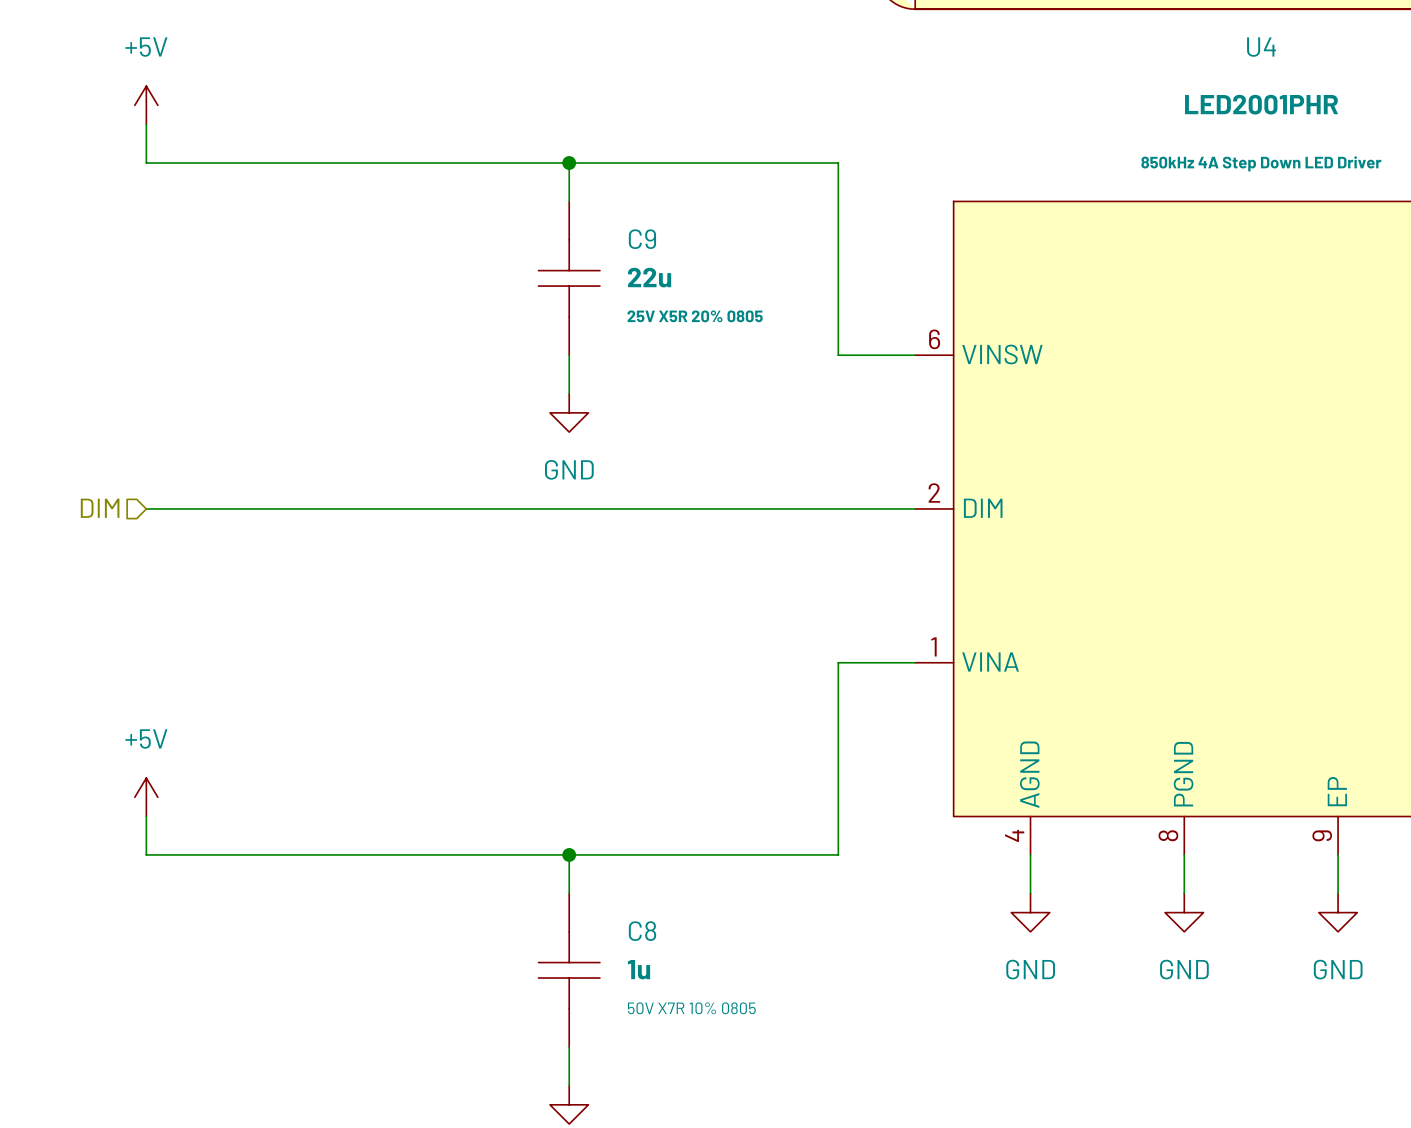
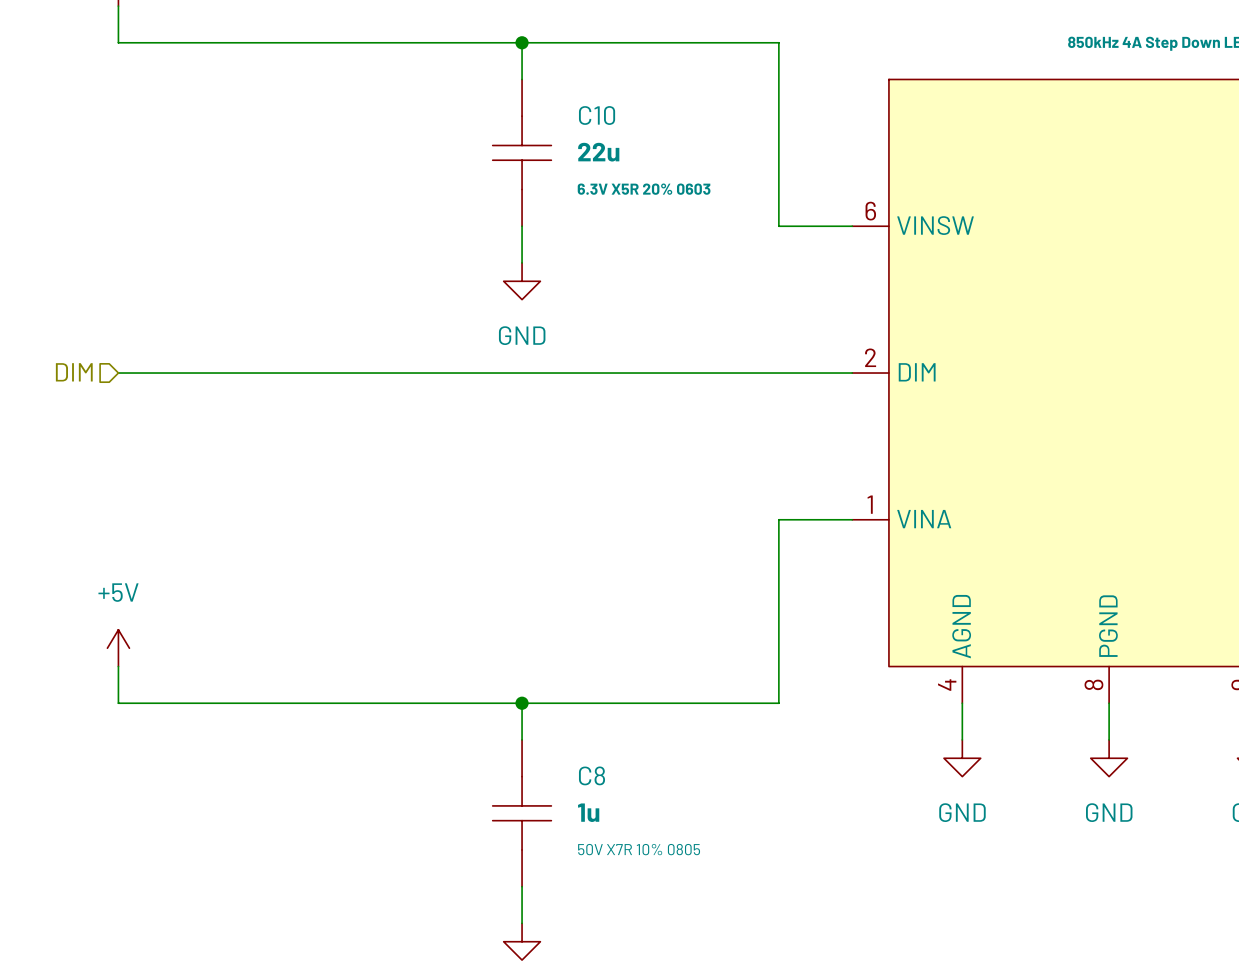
C9 name: C9 (642, 239) -> C10 (597, 115)
C9 text: 25V X5R 20% 0805 (695, 316) -> 6.3V X5R 20% 0603 (644, 189)

